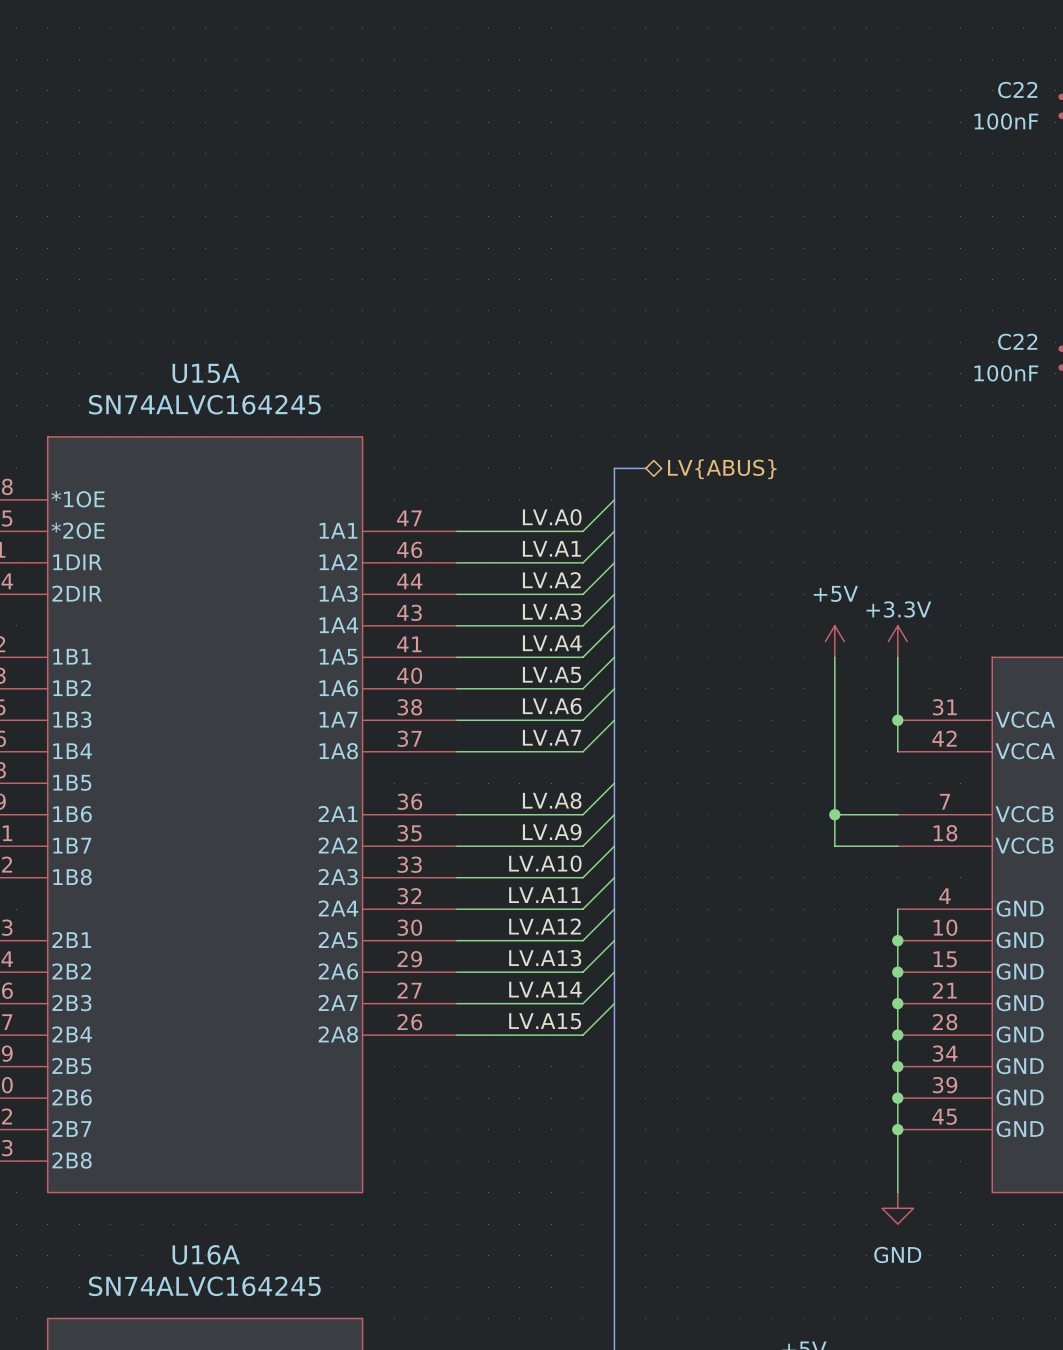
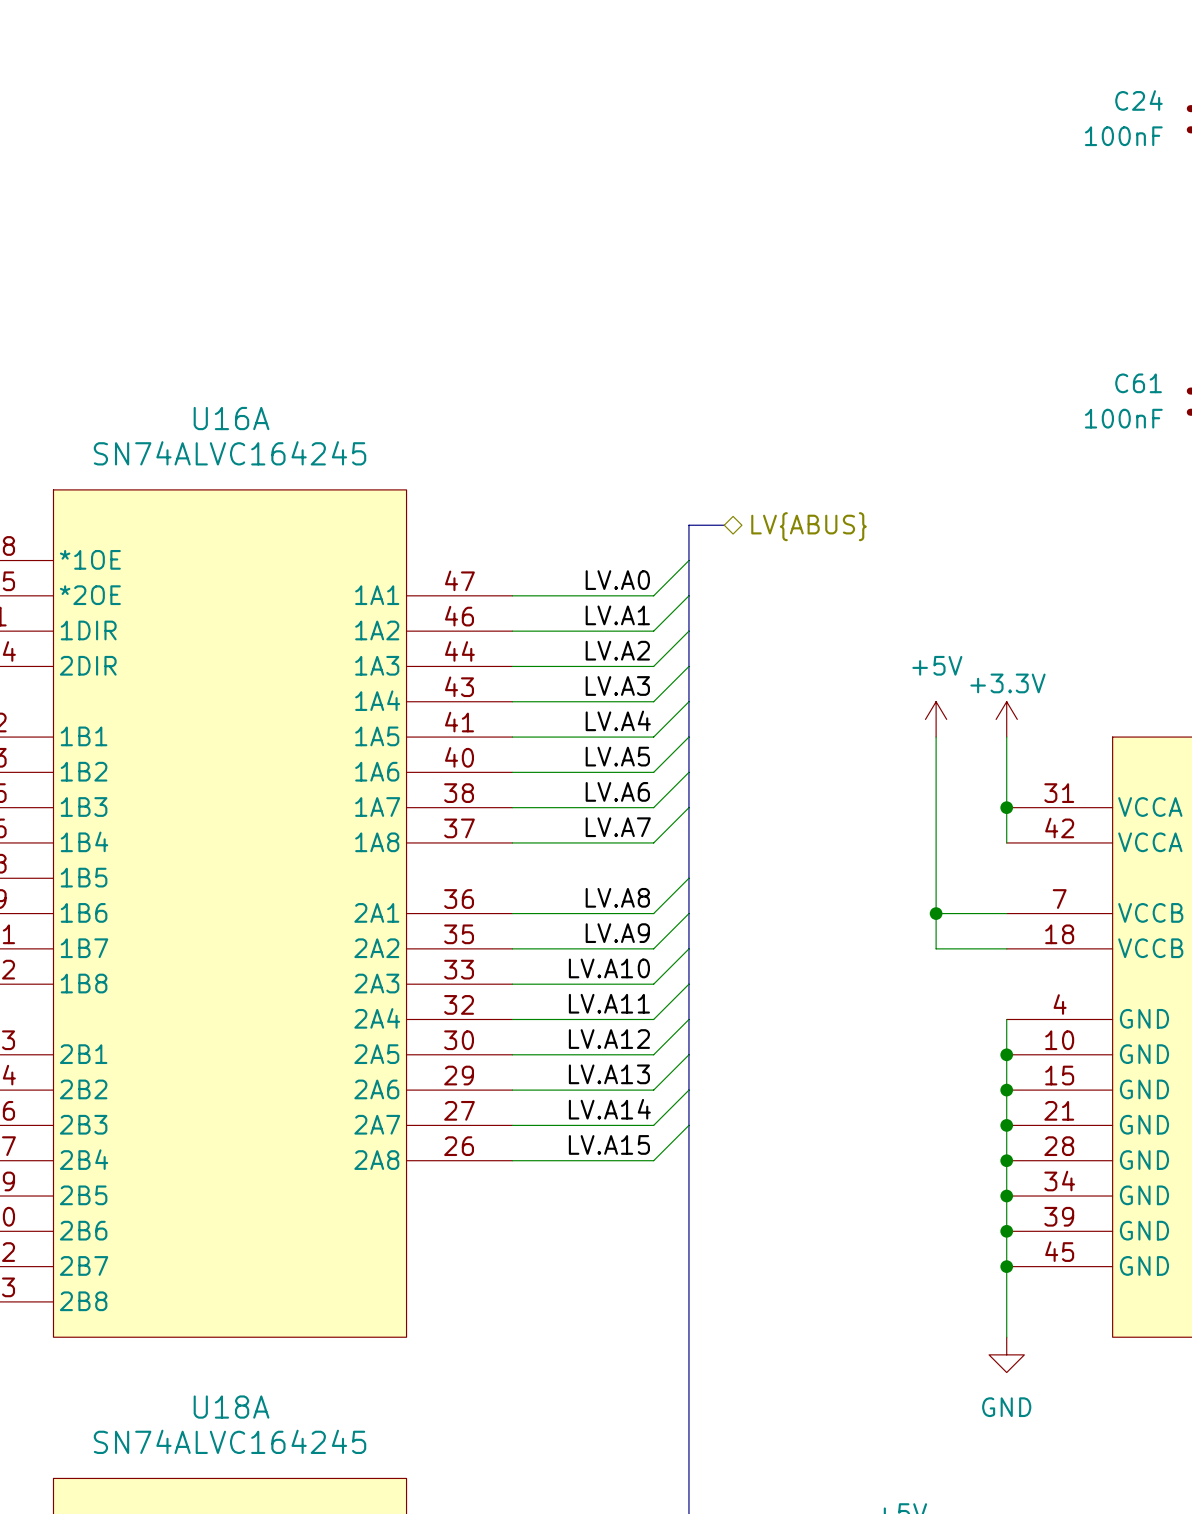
C22 name: C22 (1017, 90) -> C24 (1138, 100)
C22 name: C22 (1017, 341) -> C61 (1138, 383)
U15A name: U15A (206, 373) -> U16A (231, 418)
U16A name: U16A (206, 1254) -> U18A (231, 1407)

